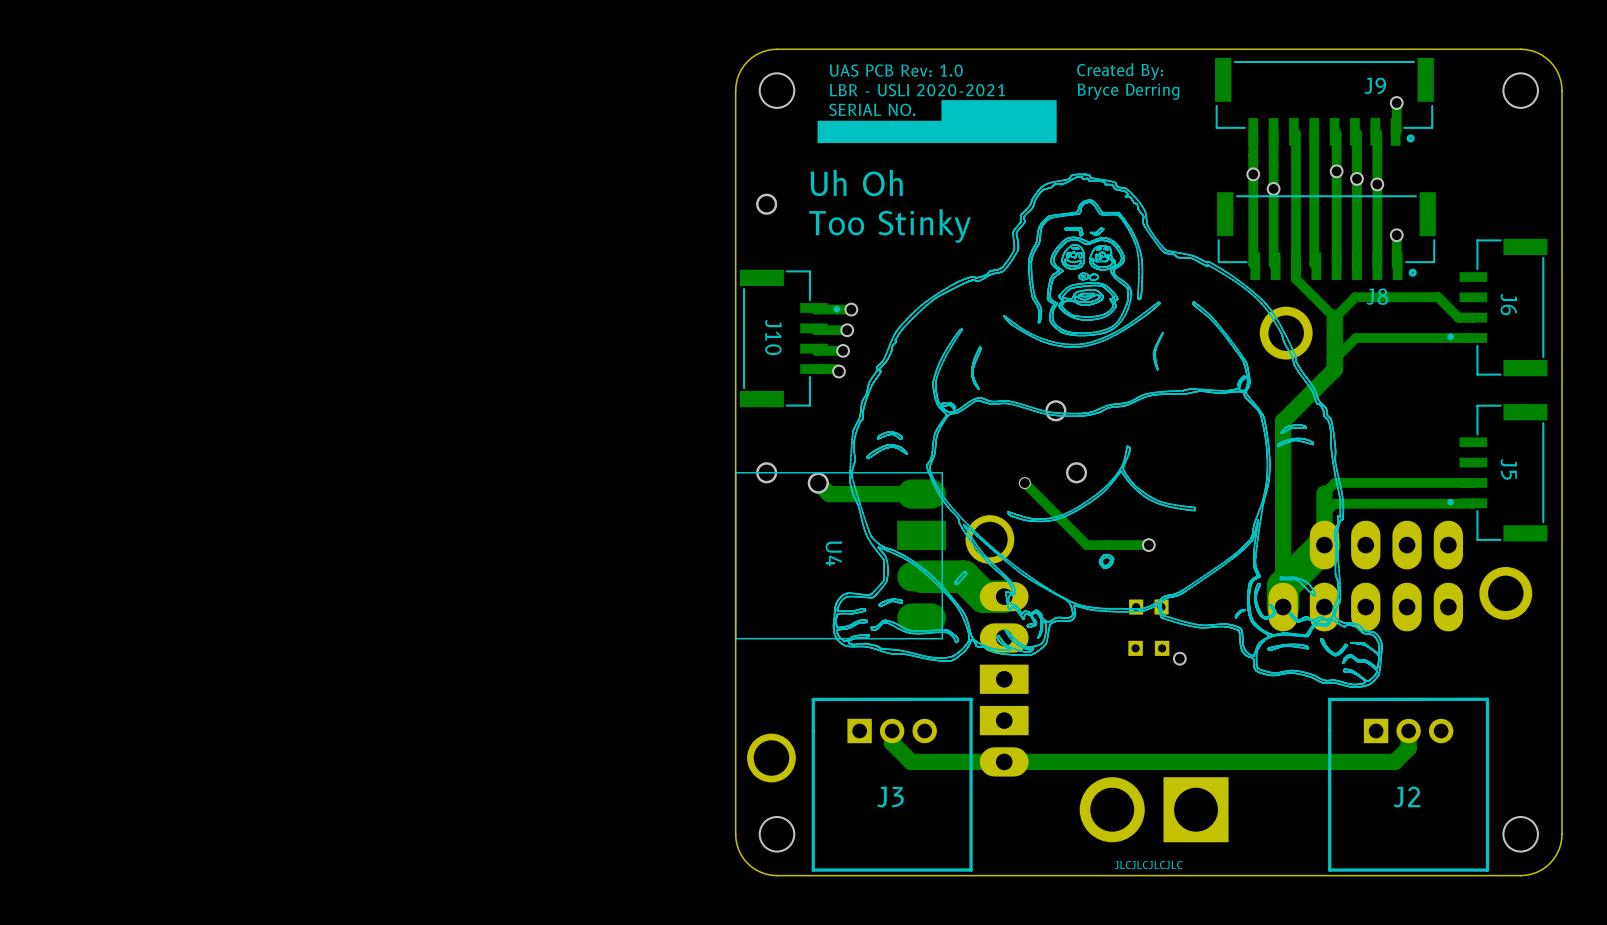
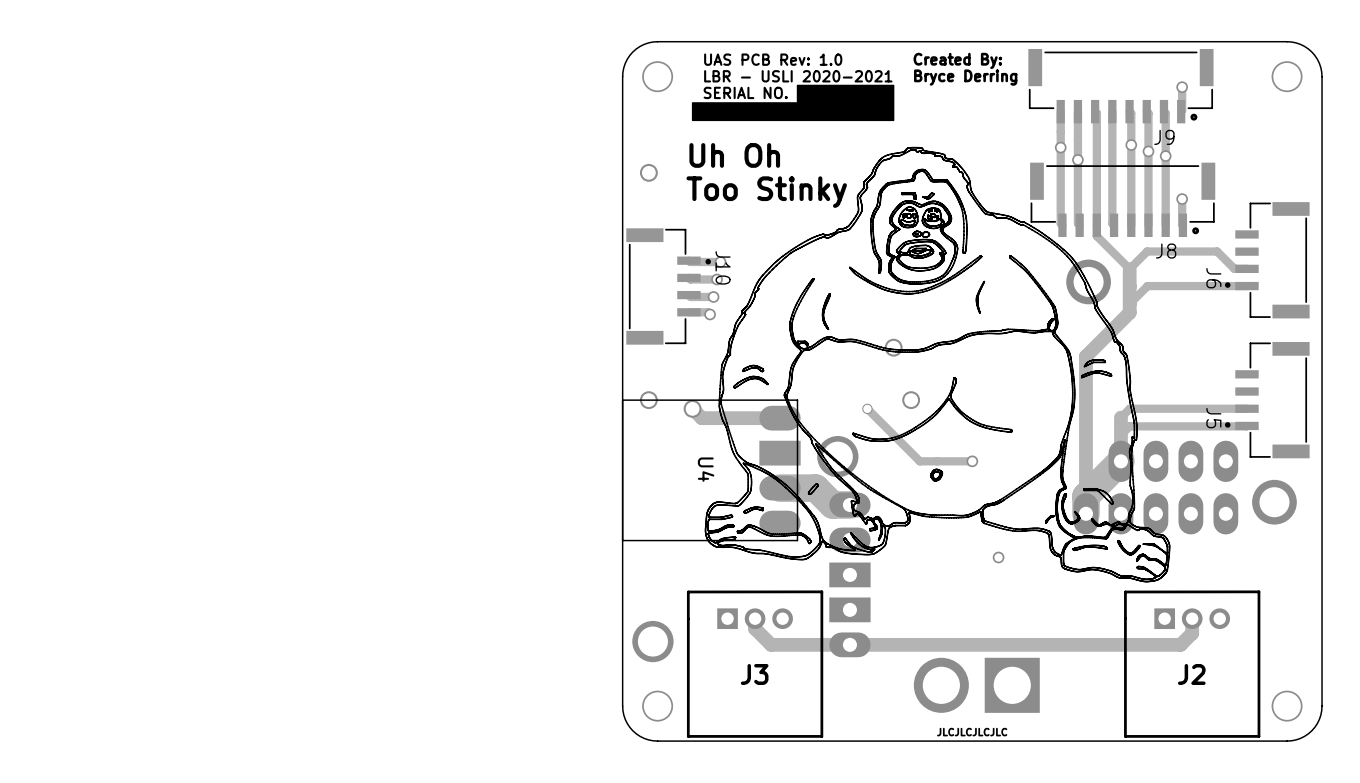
J9 name position: J9 (1375, 85) -> J9 (1164, 137)
J6 name position: J6 (1508, 304) -> J6 (1213, 278)
J10 name position: J10 (773, 337) -> J10 (723, 267)
J5 name position: J5 (1508, 469) -> J5 (1213, 418)
part: (1148, 607) -> none
part: (1148, 648) -> none

